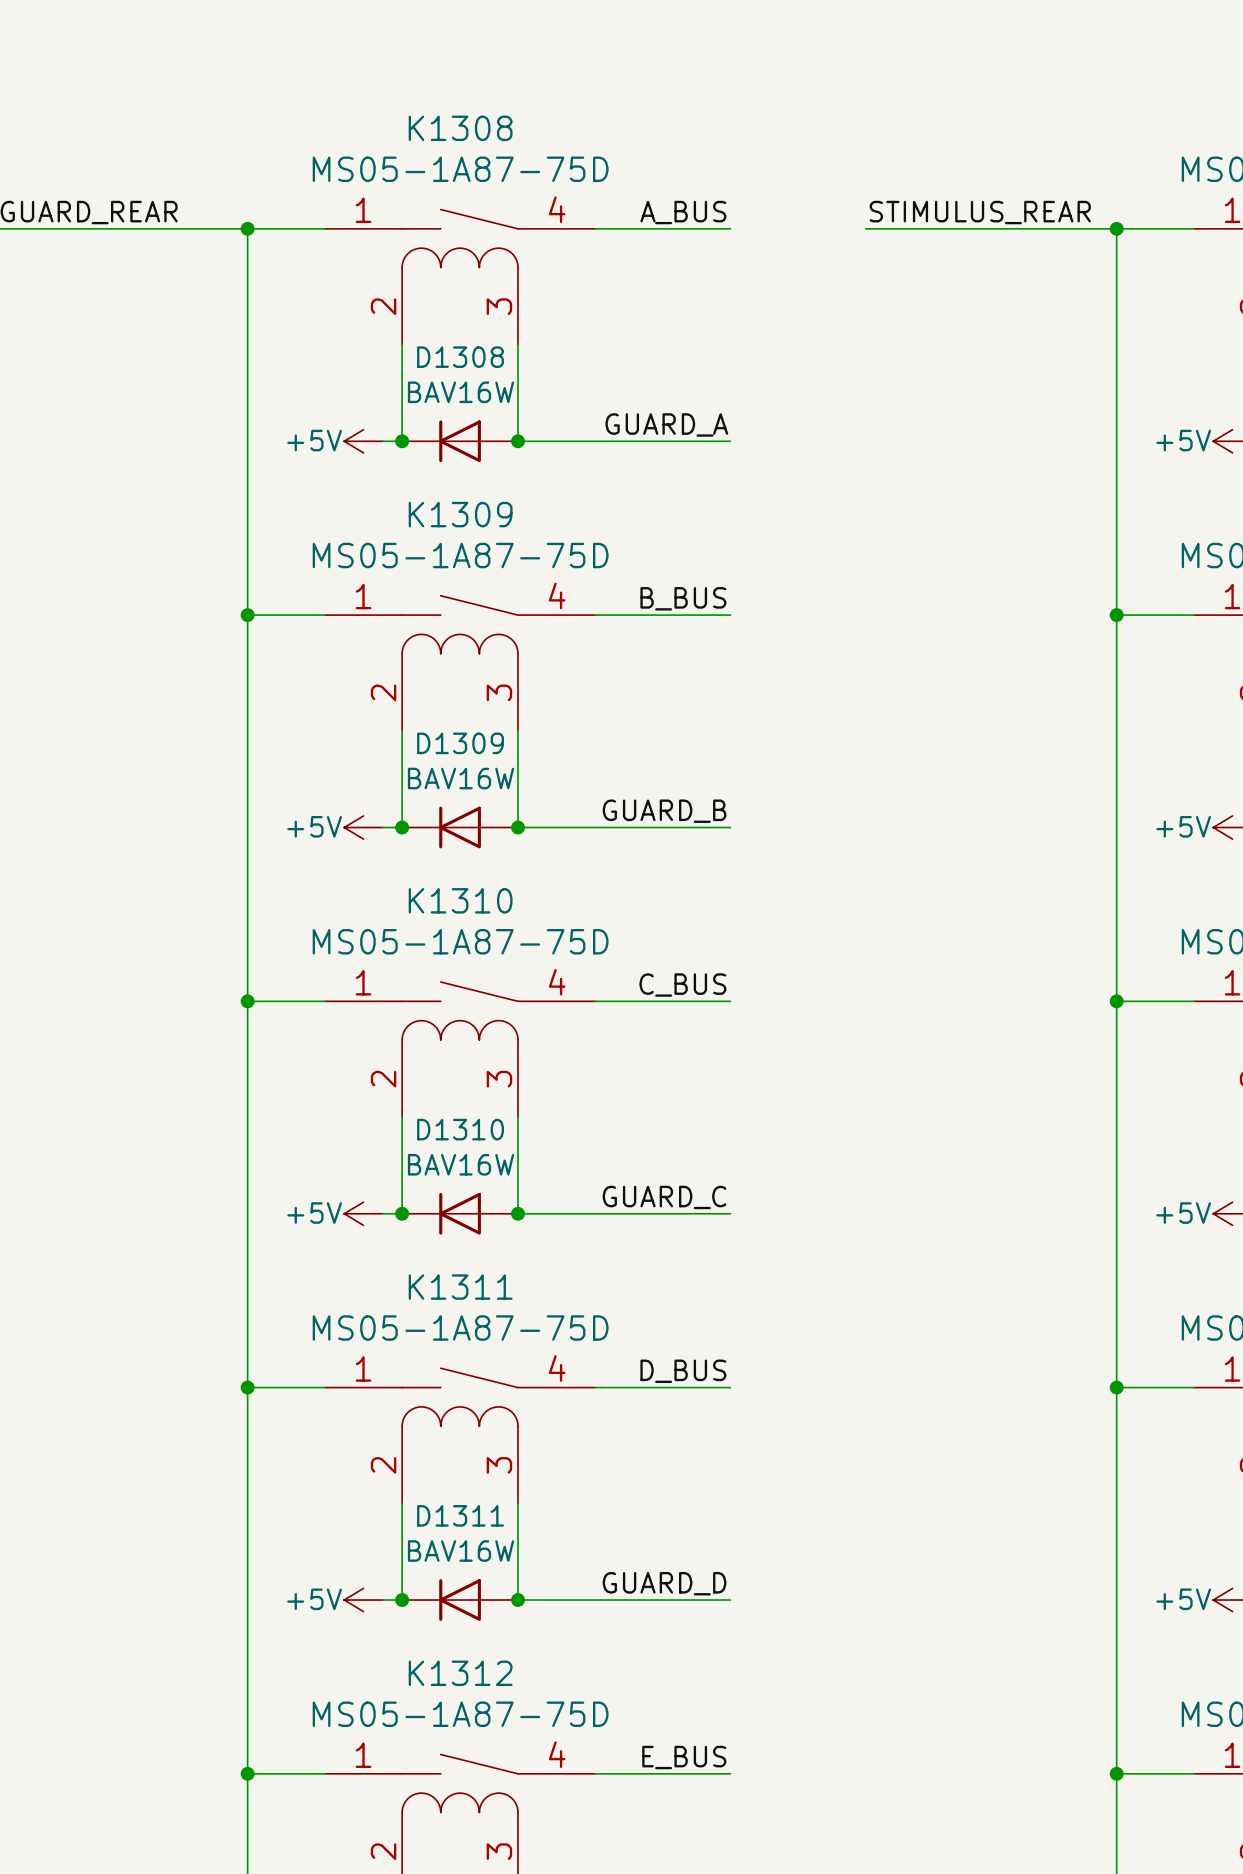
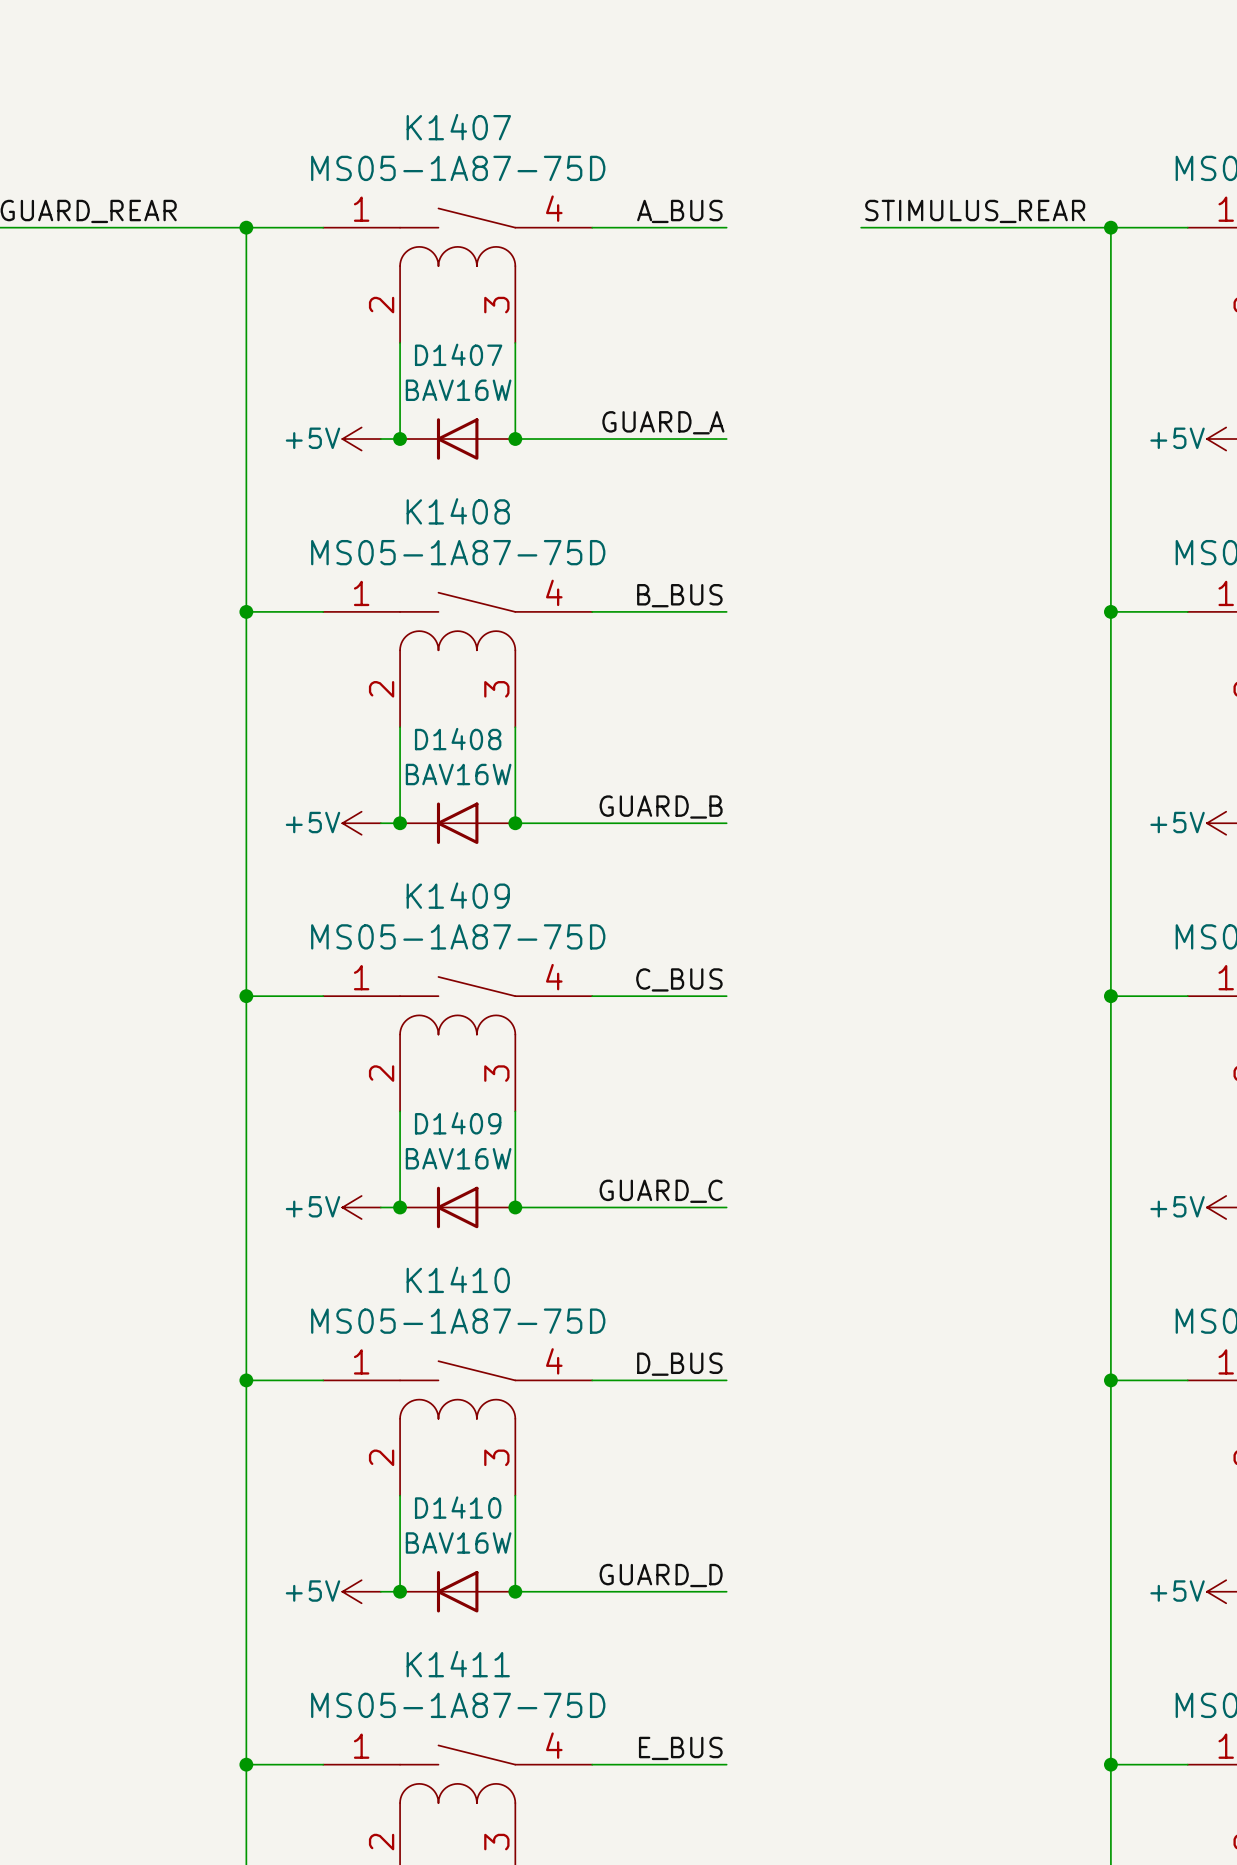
K1308 name: K1308 (460, 128) -> K1407 (458, 127)
D1308 name: D1308 (460, 357) -> D1407 (458, 354)
K1309 name: K1309 (460, 514) -> K1408 (458, 511)
D1309 name: D1309 (460, 743) -> D1408 (458, 739)
K1310 name: K1310 (460, 900) -> K1409 (458, 895)
D1310 name: D1310 (460, 1129) -> D1409 (458, 1123)
K1311 name: K1311 (460, 1287) -> K1410 (458, 1279)
D1311 name: D1311 (460, 1515) -> D1410 (458, 1507)
K1312 name: K1312 (460, 1673) -> K1411 (458, 1664)

